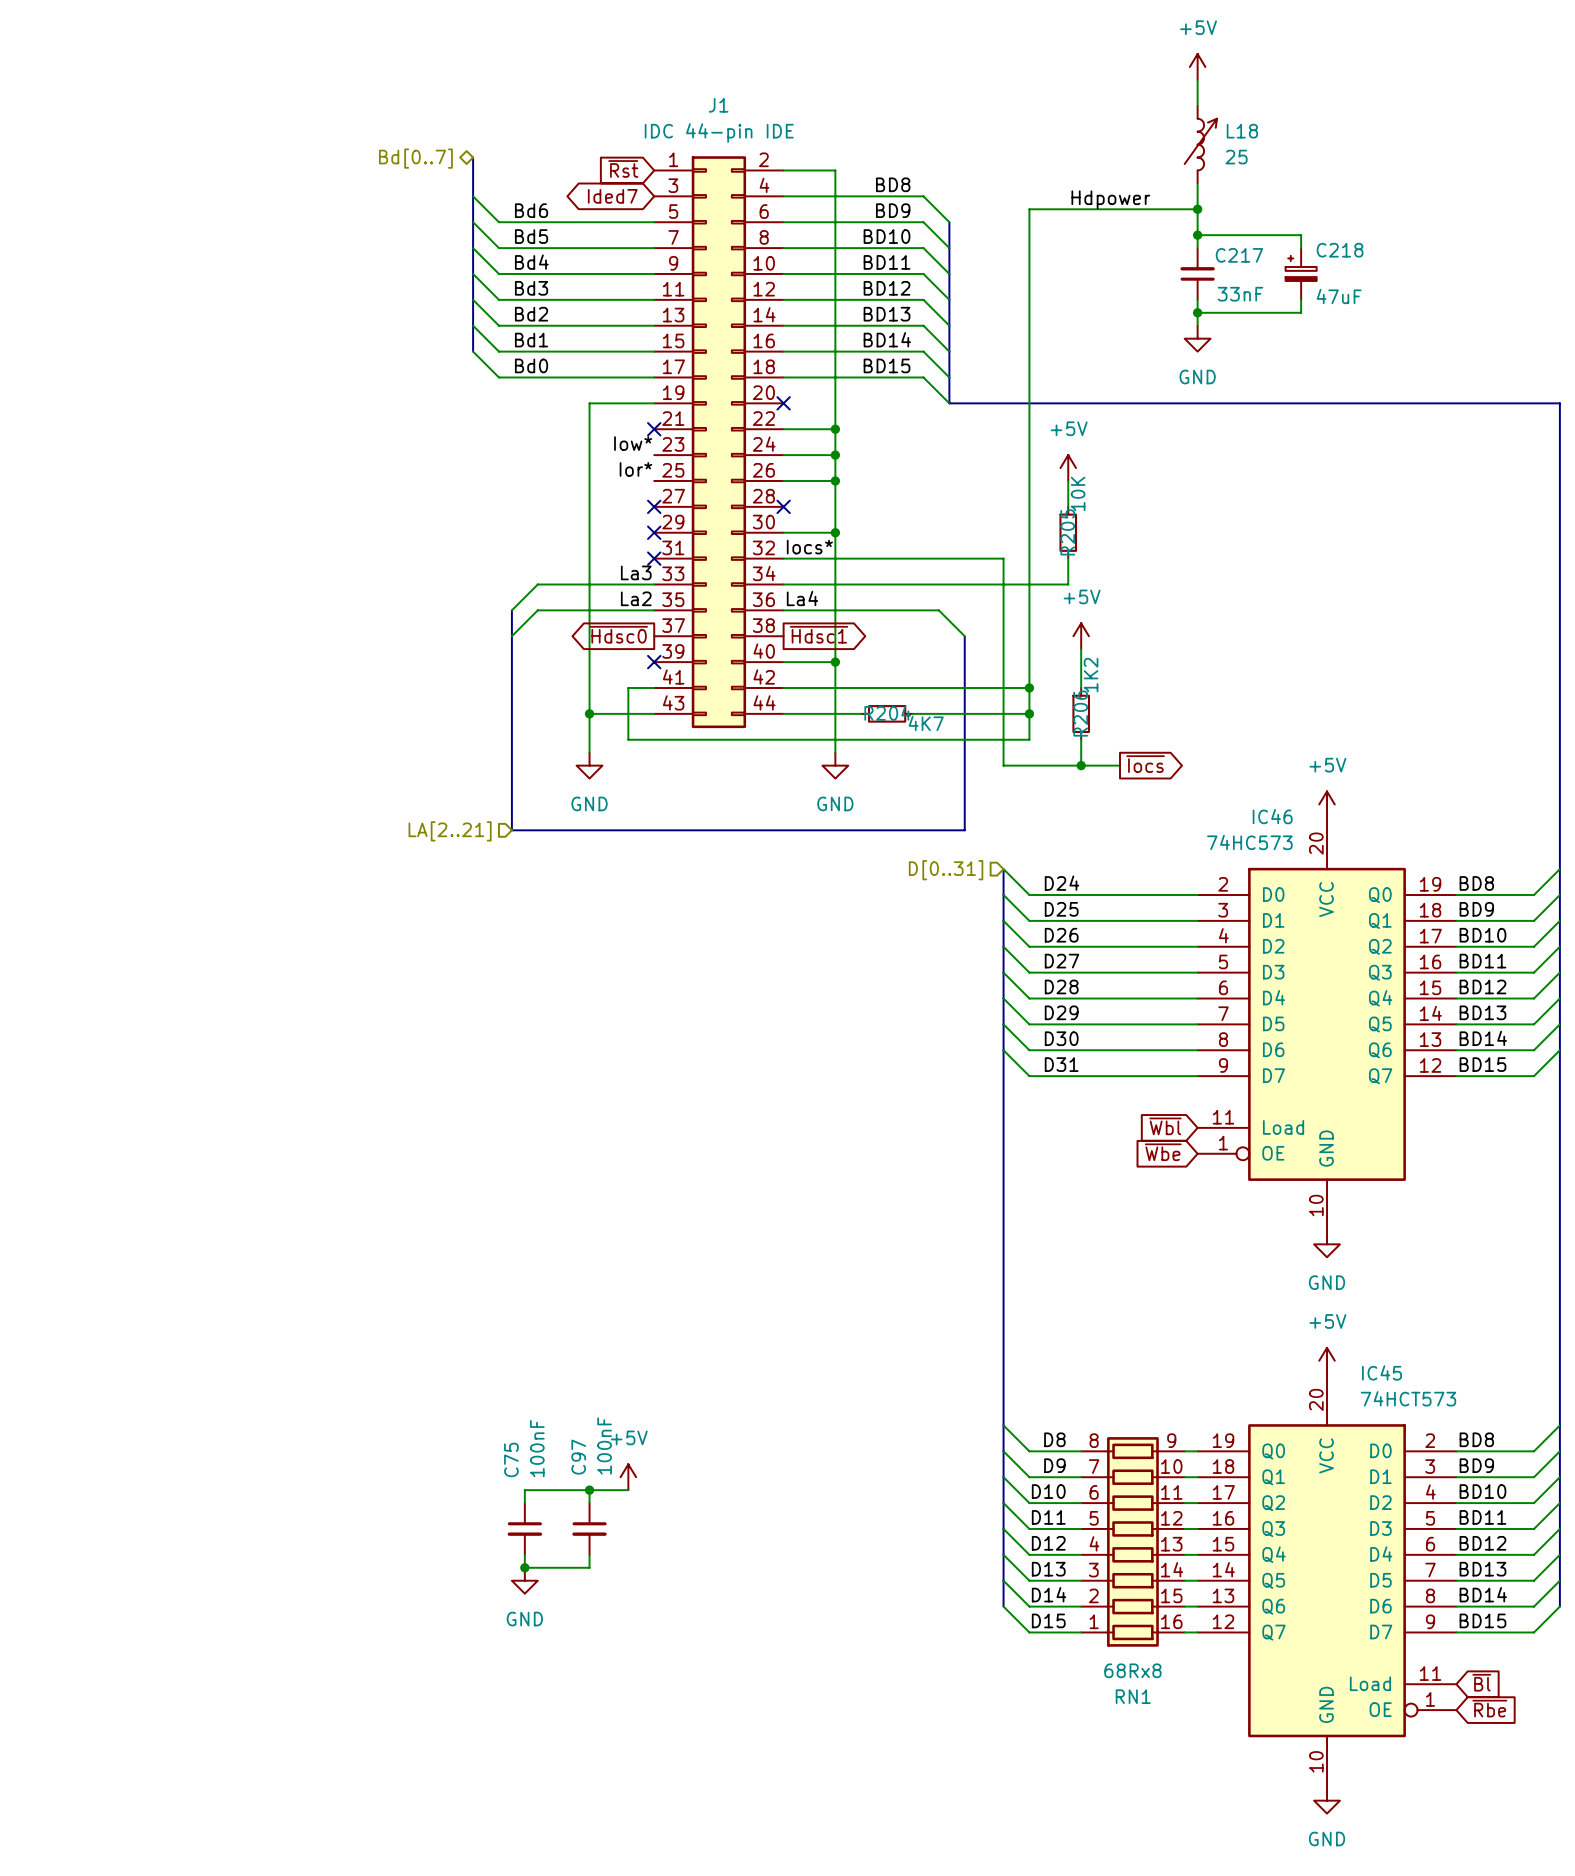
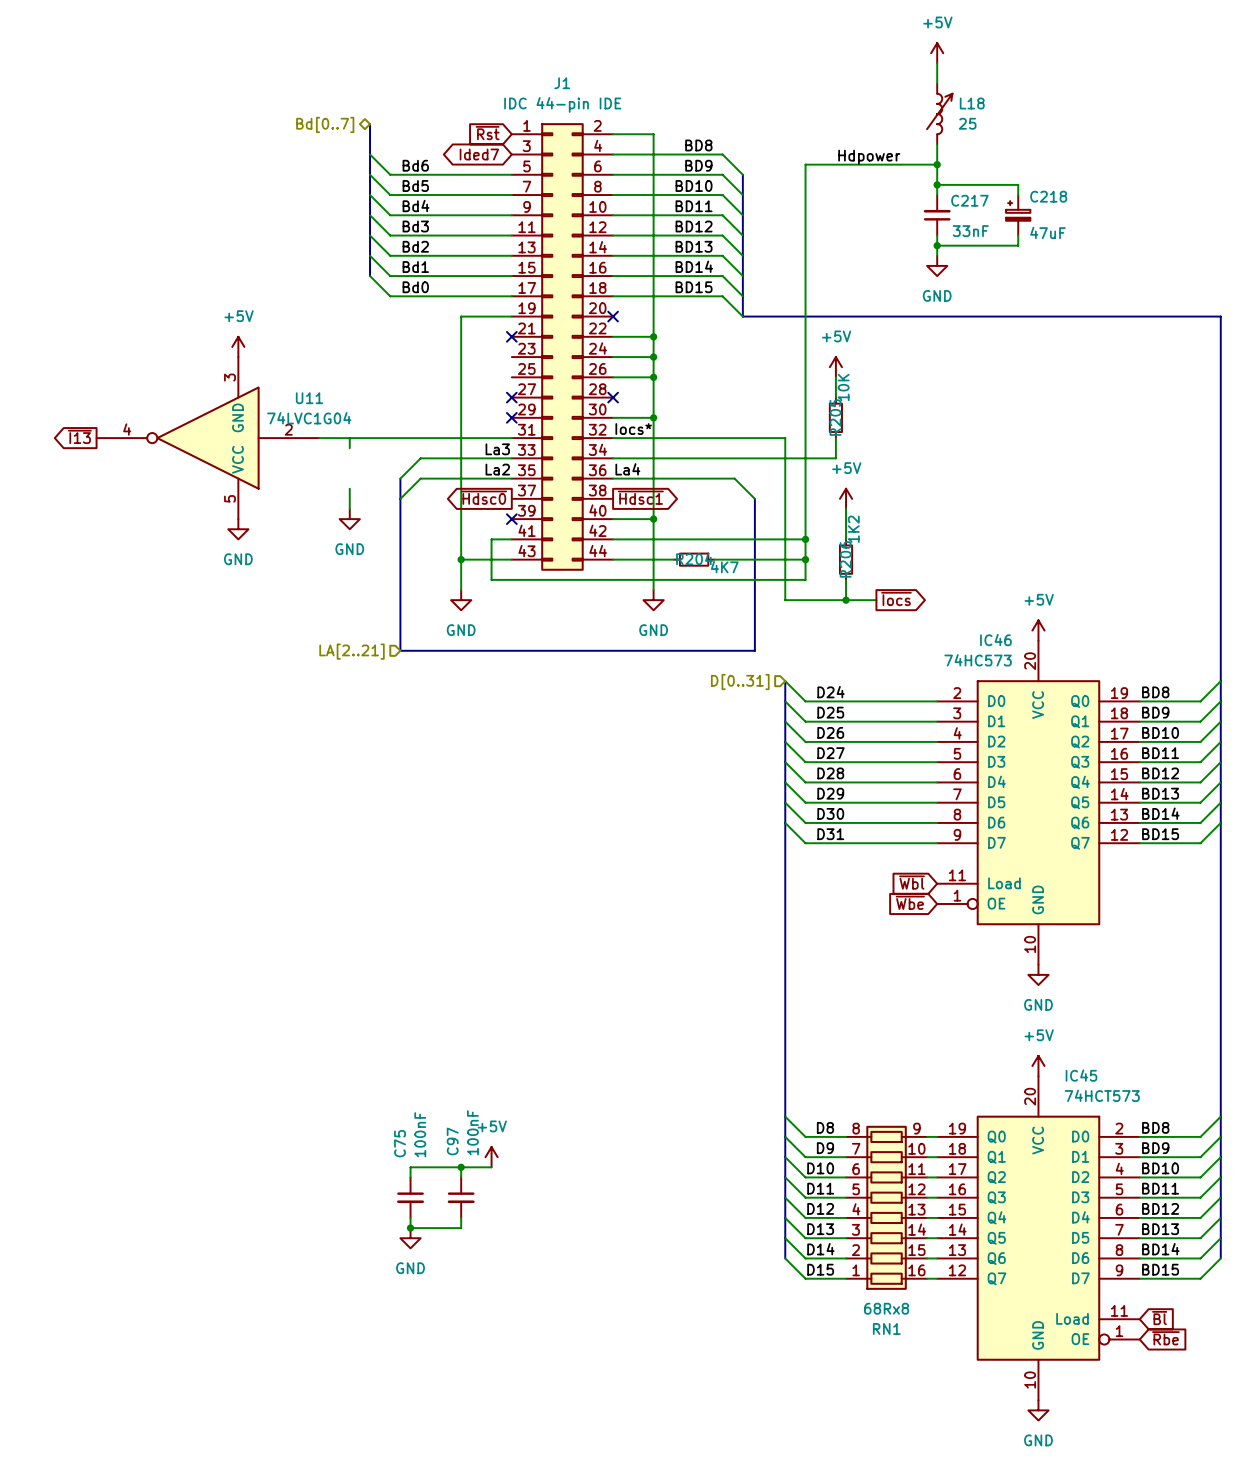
power symbol: none -> +5V (238, 346)
label: Iow* (633, 443) -> none
label: Ior* (635, 469) -> none
global label: none -> ~{I13} (79, 436)
U11: none -> 74LVC1G04 (207, 438)
wire: none -> (319, 438) (511, 438)
wire: none -> (349, 438) (349, 448)
no-connect mark: (654, 558) -> none
wire: none -> (349, 488) (349, 509)
power symbol: none -> GND (349, 519)
power symbol: none -> GND (238, 529)

